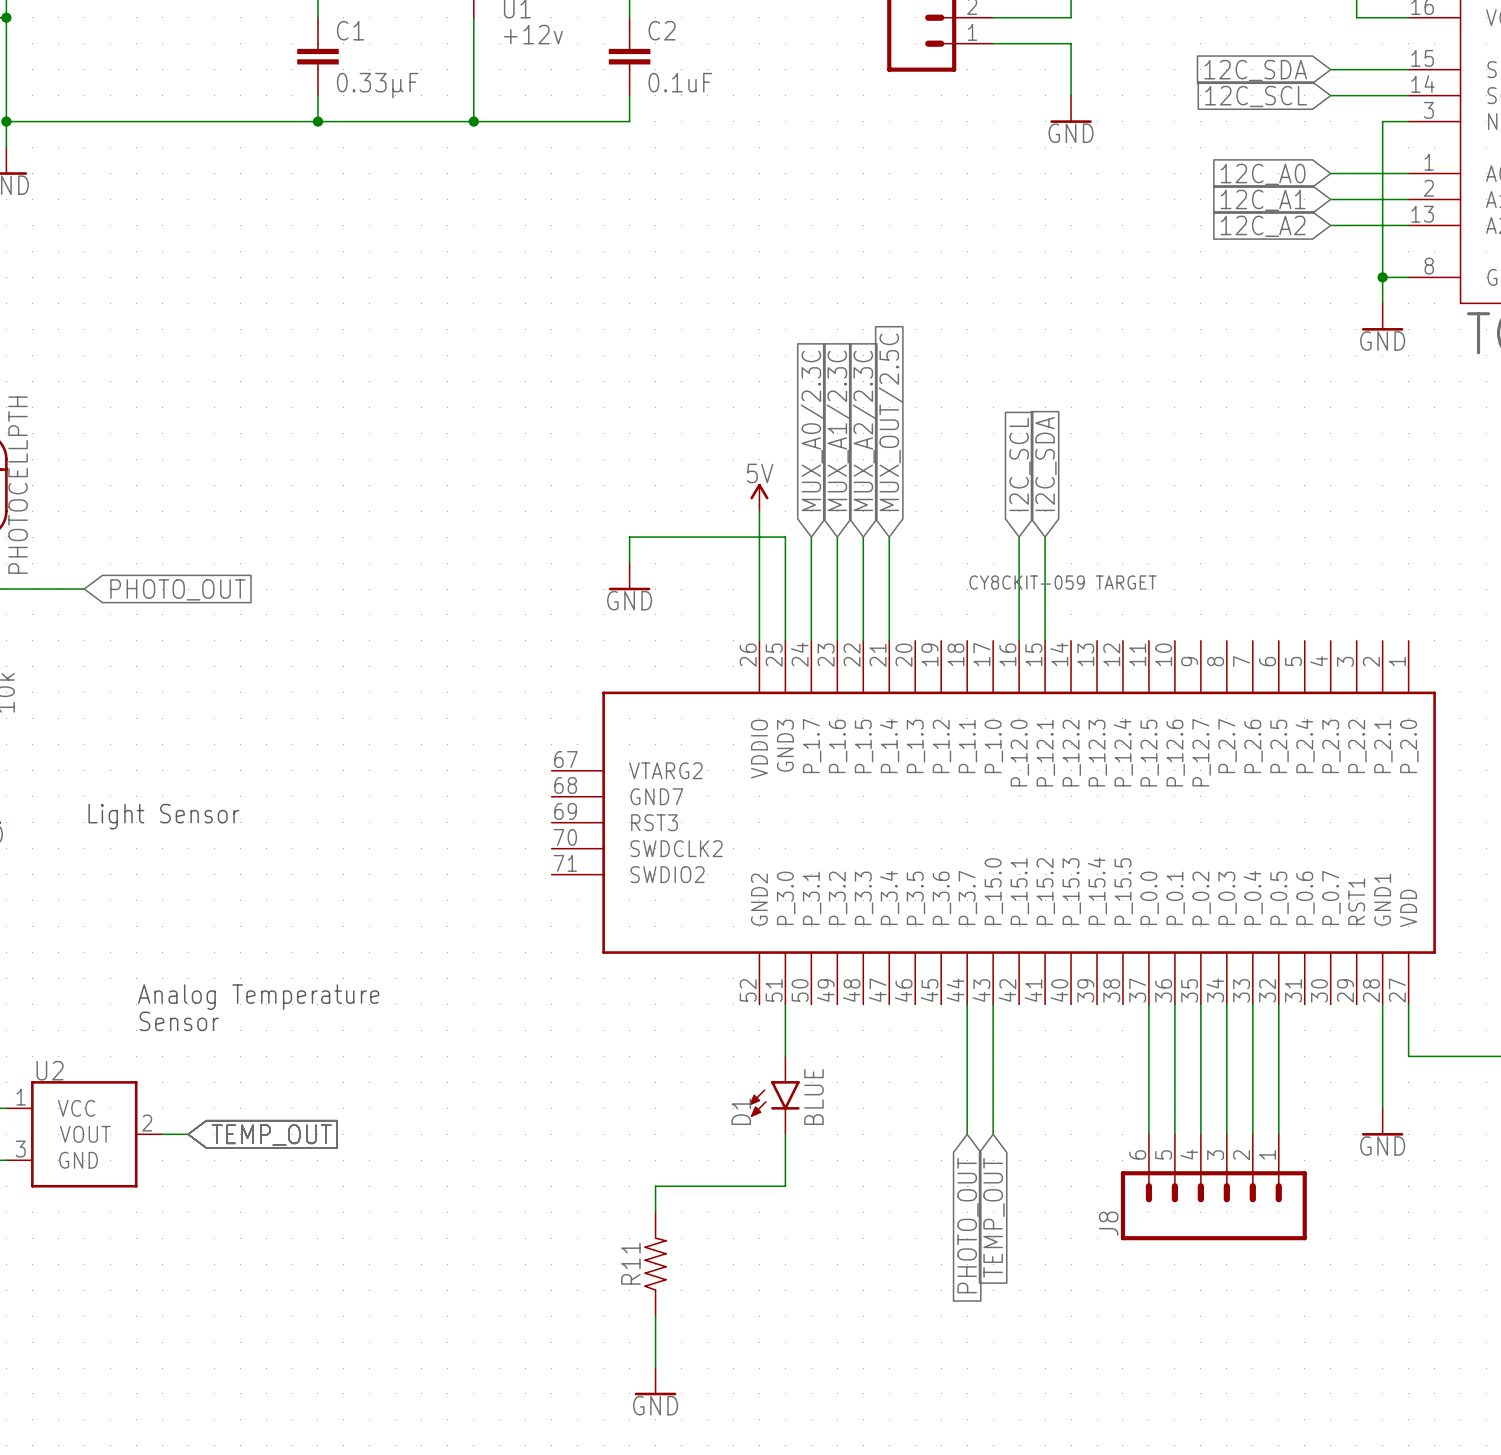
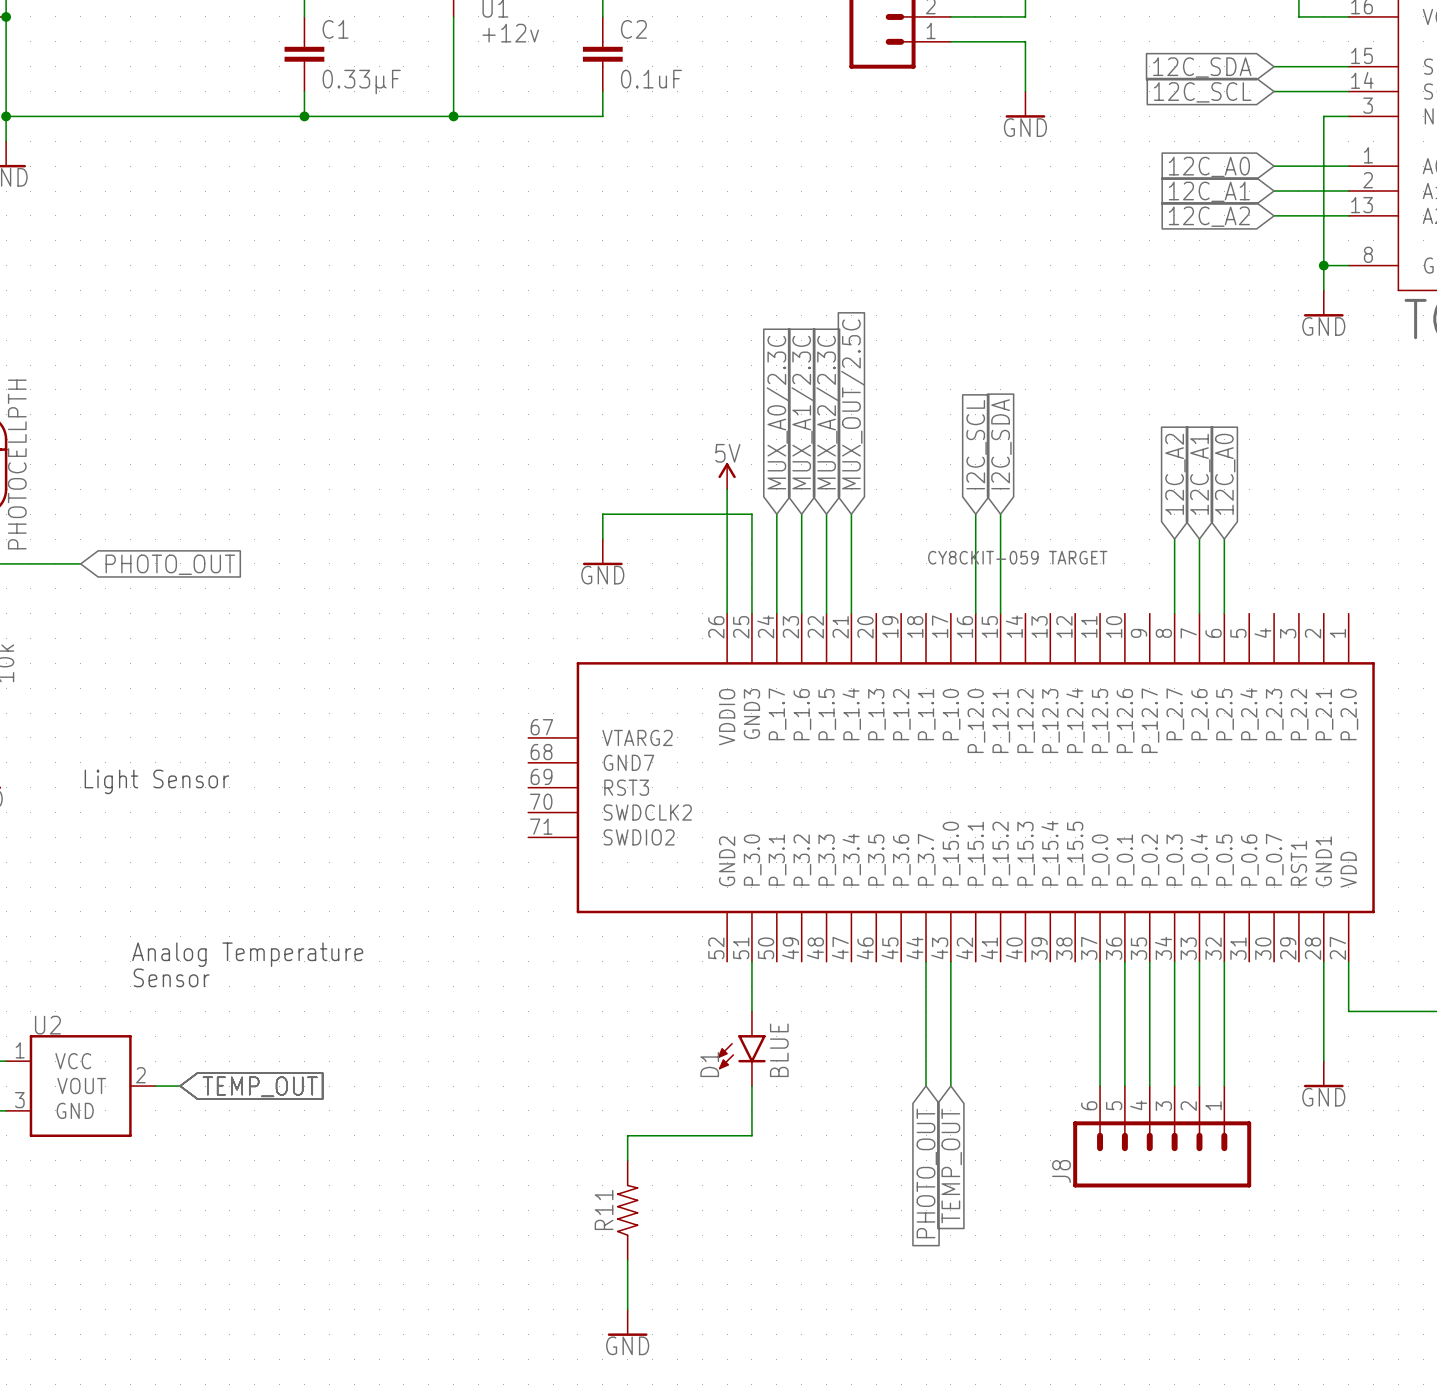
global label: none -> 12C_A2 (1175, 474)
global label: none -> 12C_A1 (1200, 474)
global label: none -> 12C_A0 (1225, 474)
wire: none -> (1174, 539) (1174, 613)
wire: none -> (1199, 539) (1199, 613)
wire: none -> (1224, 539) (1224, 613)

